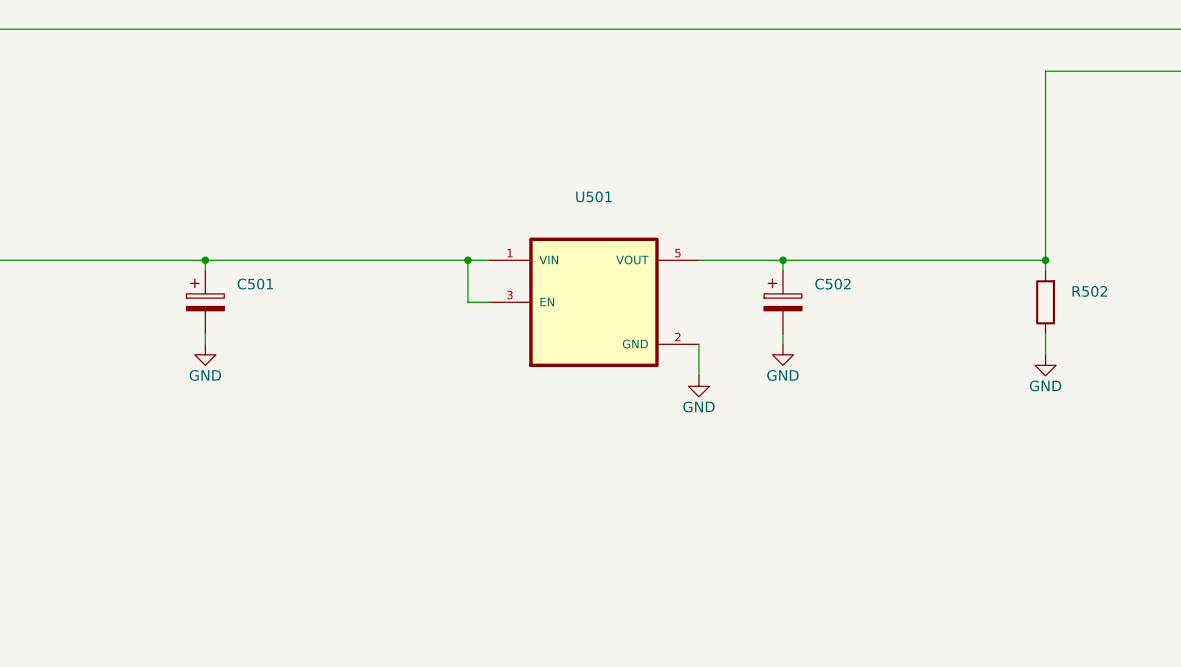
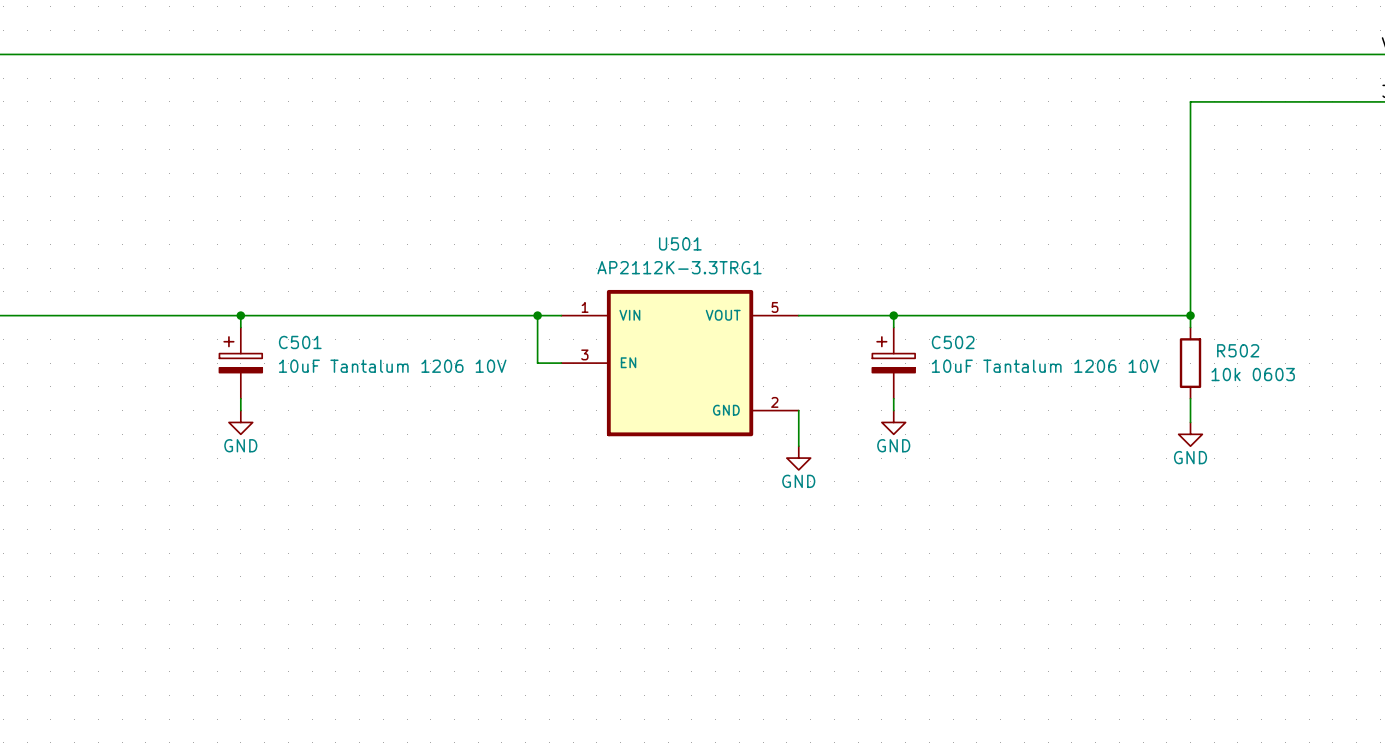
U501 value: none -> AP2112K-3.3TRG1 (679, 267)
C501 value: none -> 10uF Tantalum 1206 10V (392, 366)
C502 value: none -> 10uF Tantalum 1206 10V (1045, 366)
R502 value: none -> 10k 0603 (1253, 374)

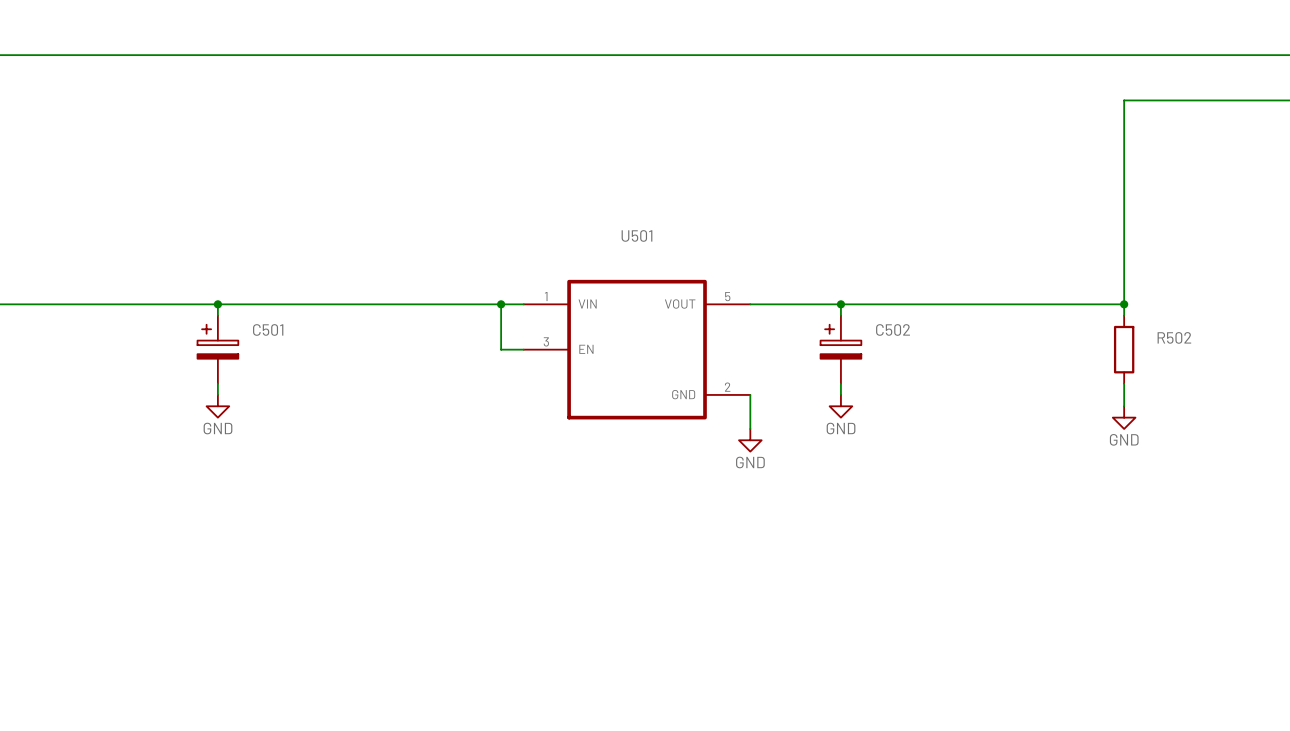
U501 value: AP2112K-3.3TRG1 (679, 267) -> none
C501 value: 10uF Tantalum 1206 10V (392, 366) -> none
C502 value: 10uF Tantalum 1206 10V (1045, 366) -> none
R502 value: 10k 0603 (1253, 374) -> none

